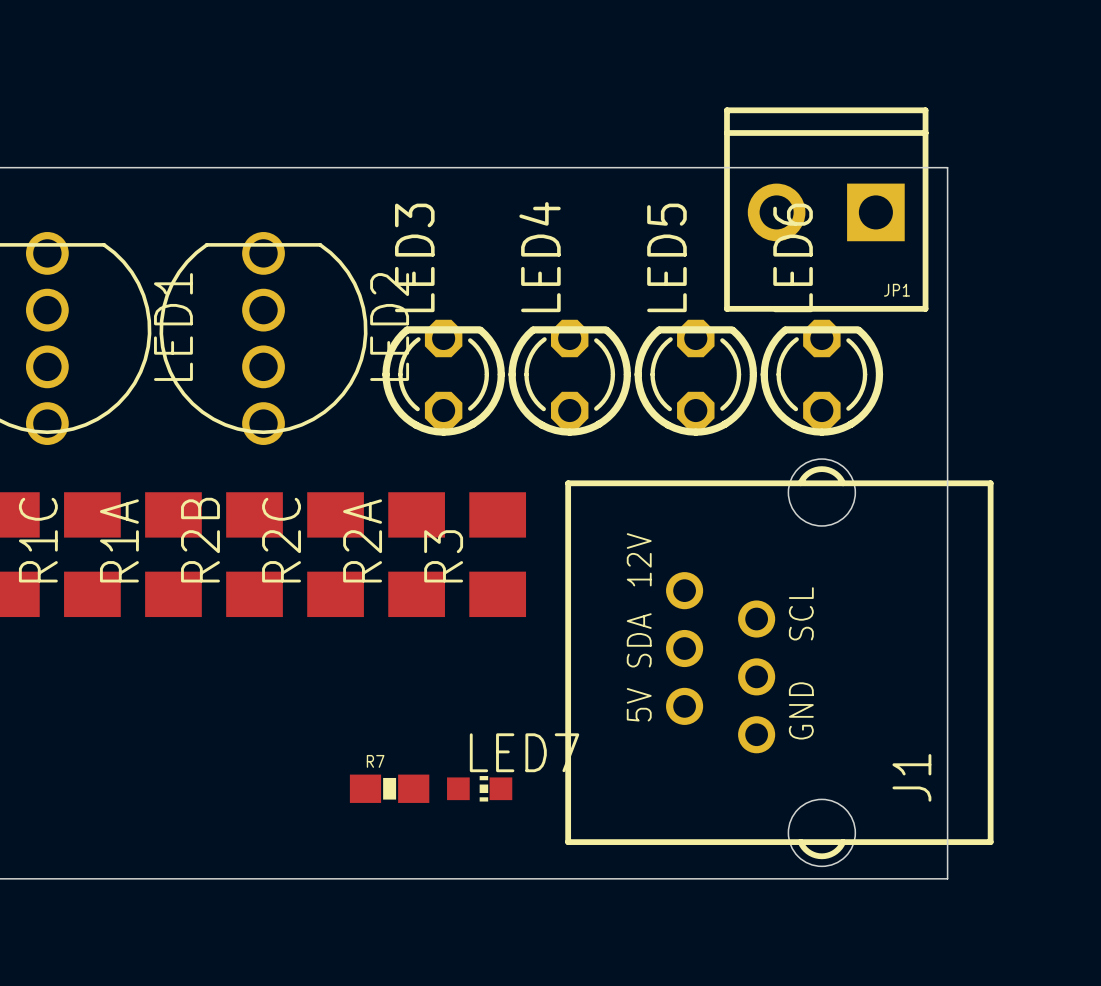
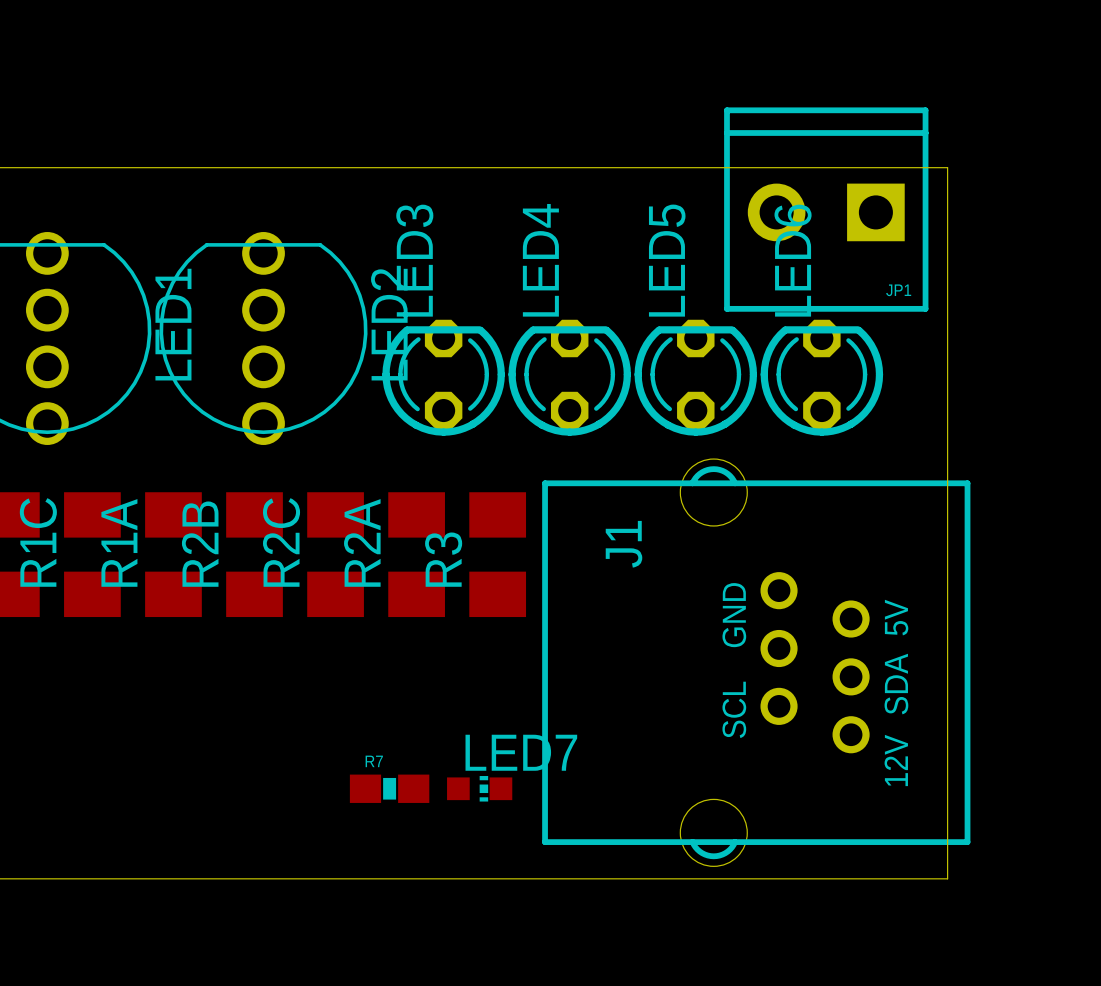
J1 footprint: [565, 459, 994, 867] -> [542, 459, 971, 867]
J1 name position: J1 (911, 777) -> J1 (624, 544)

